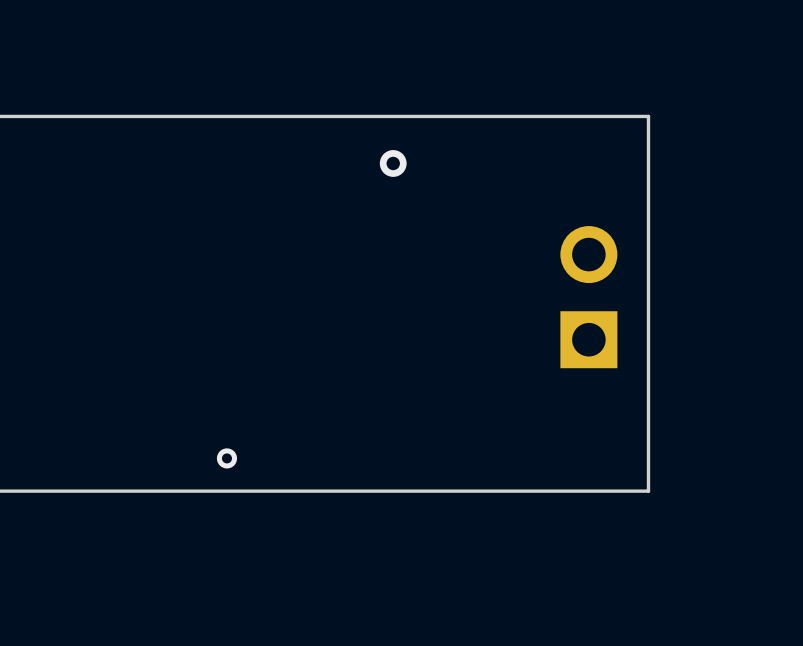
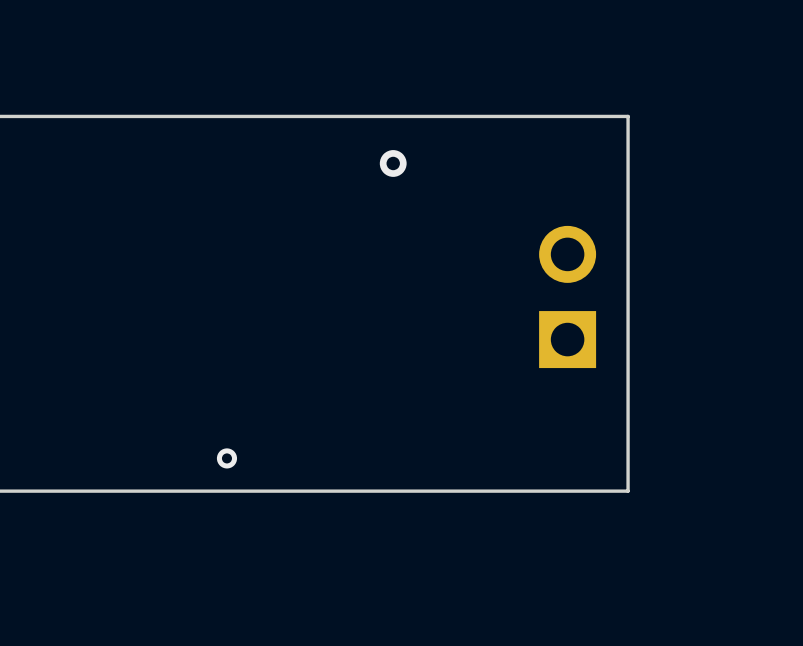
board edge: (628, 116) (648, 116) (648, 491) (628, 491) -> (628, 116) (628, 491)
part position: (588, 297) -> (567, 296)

